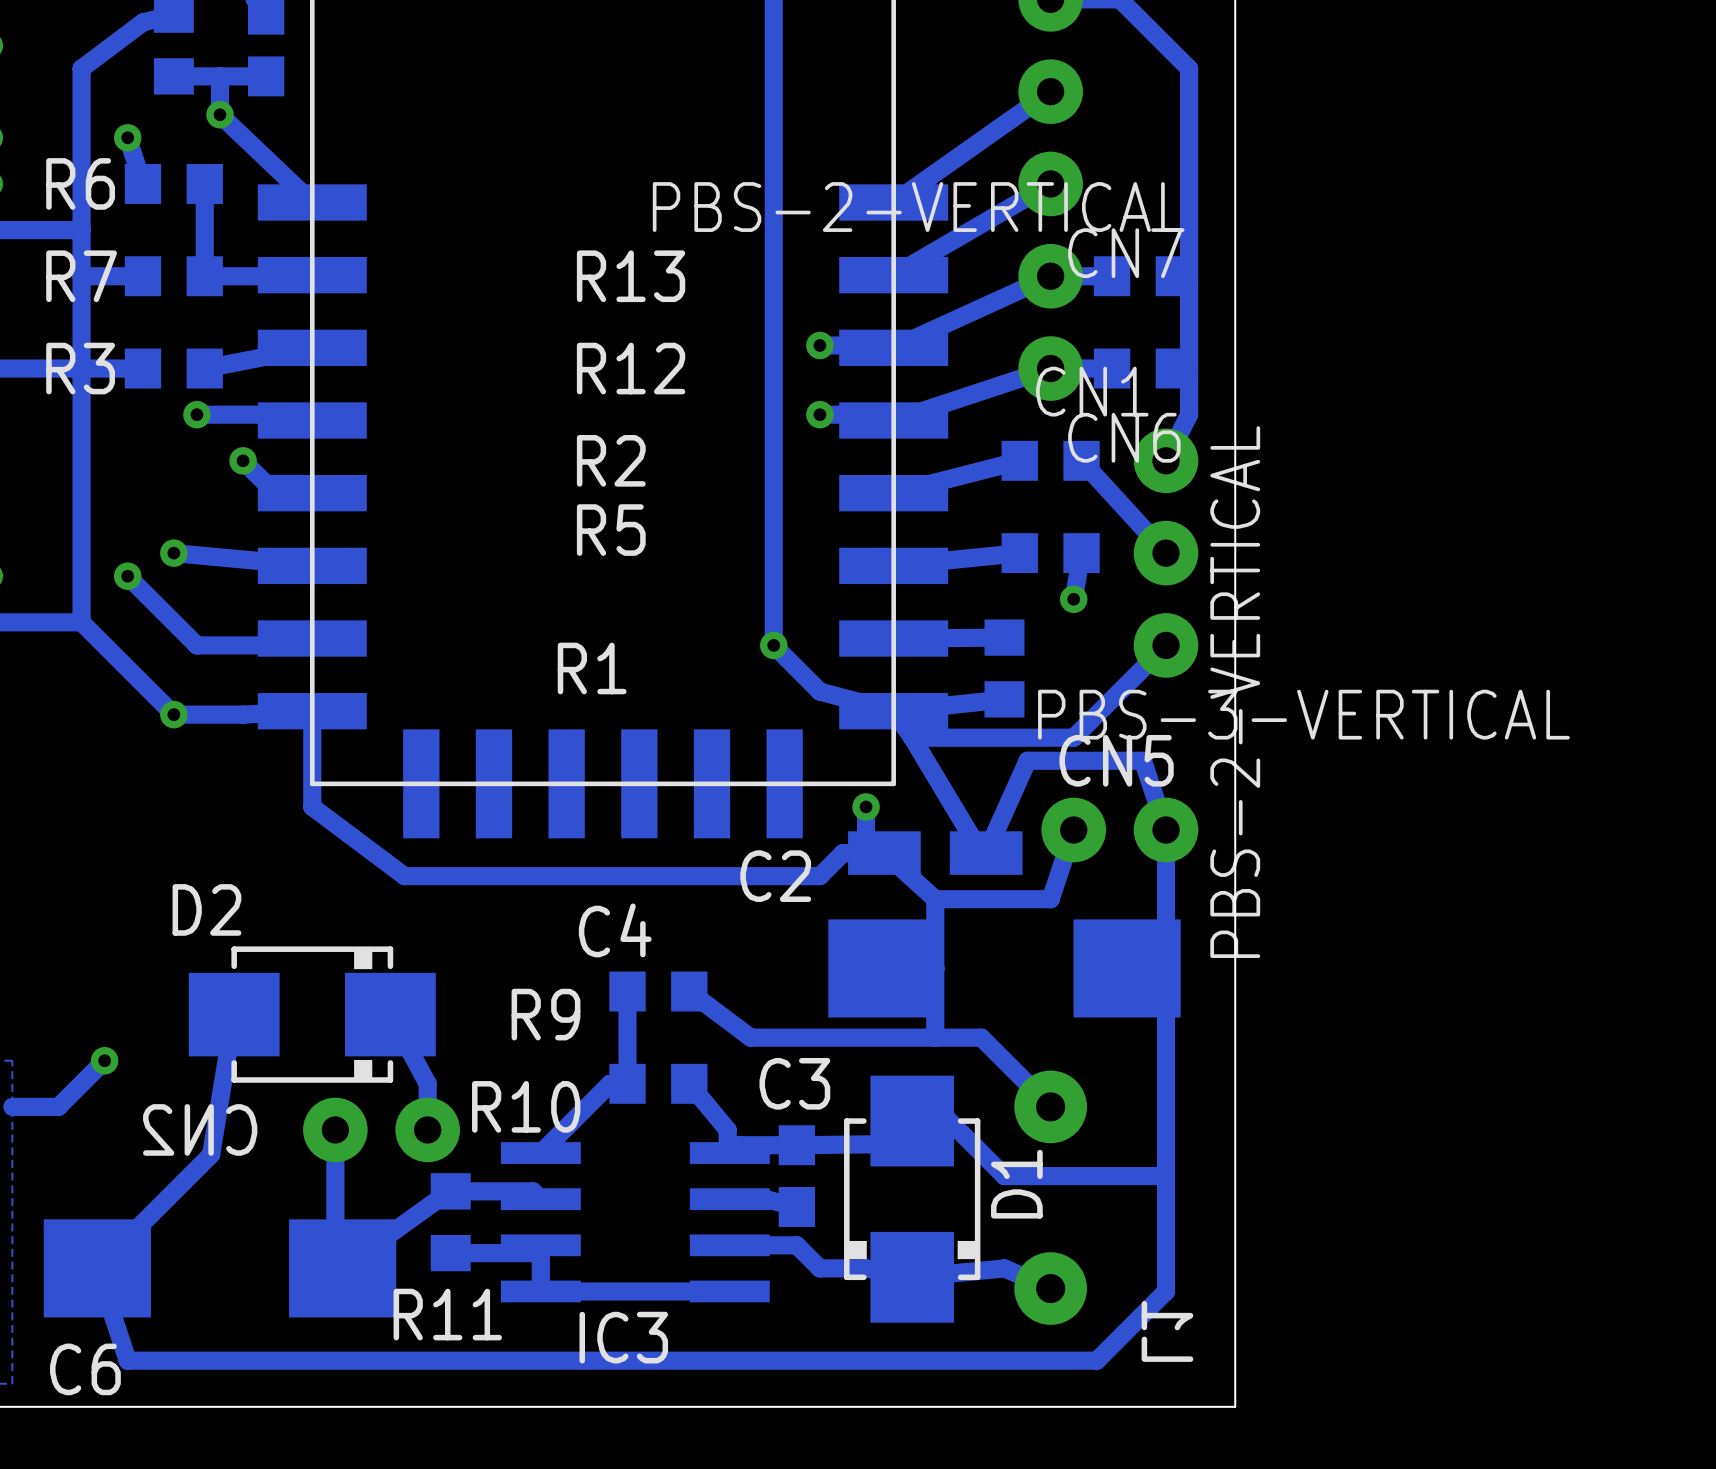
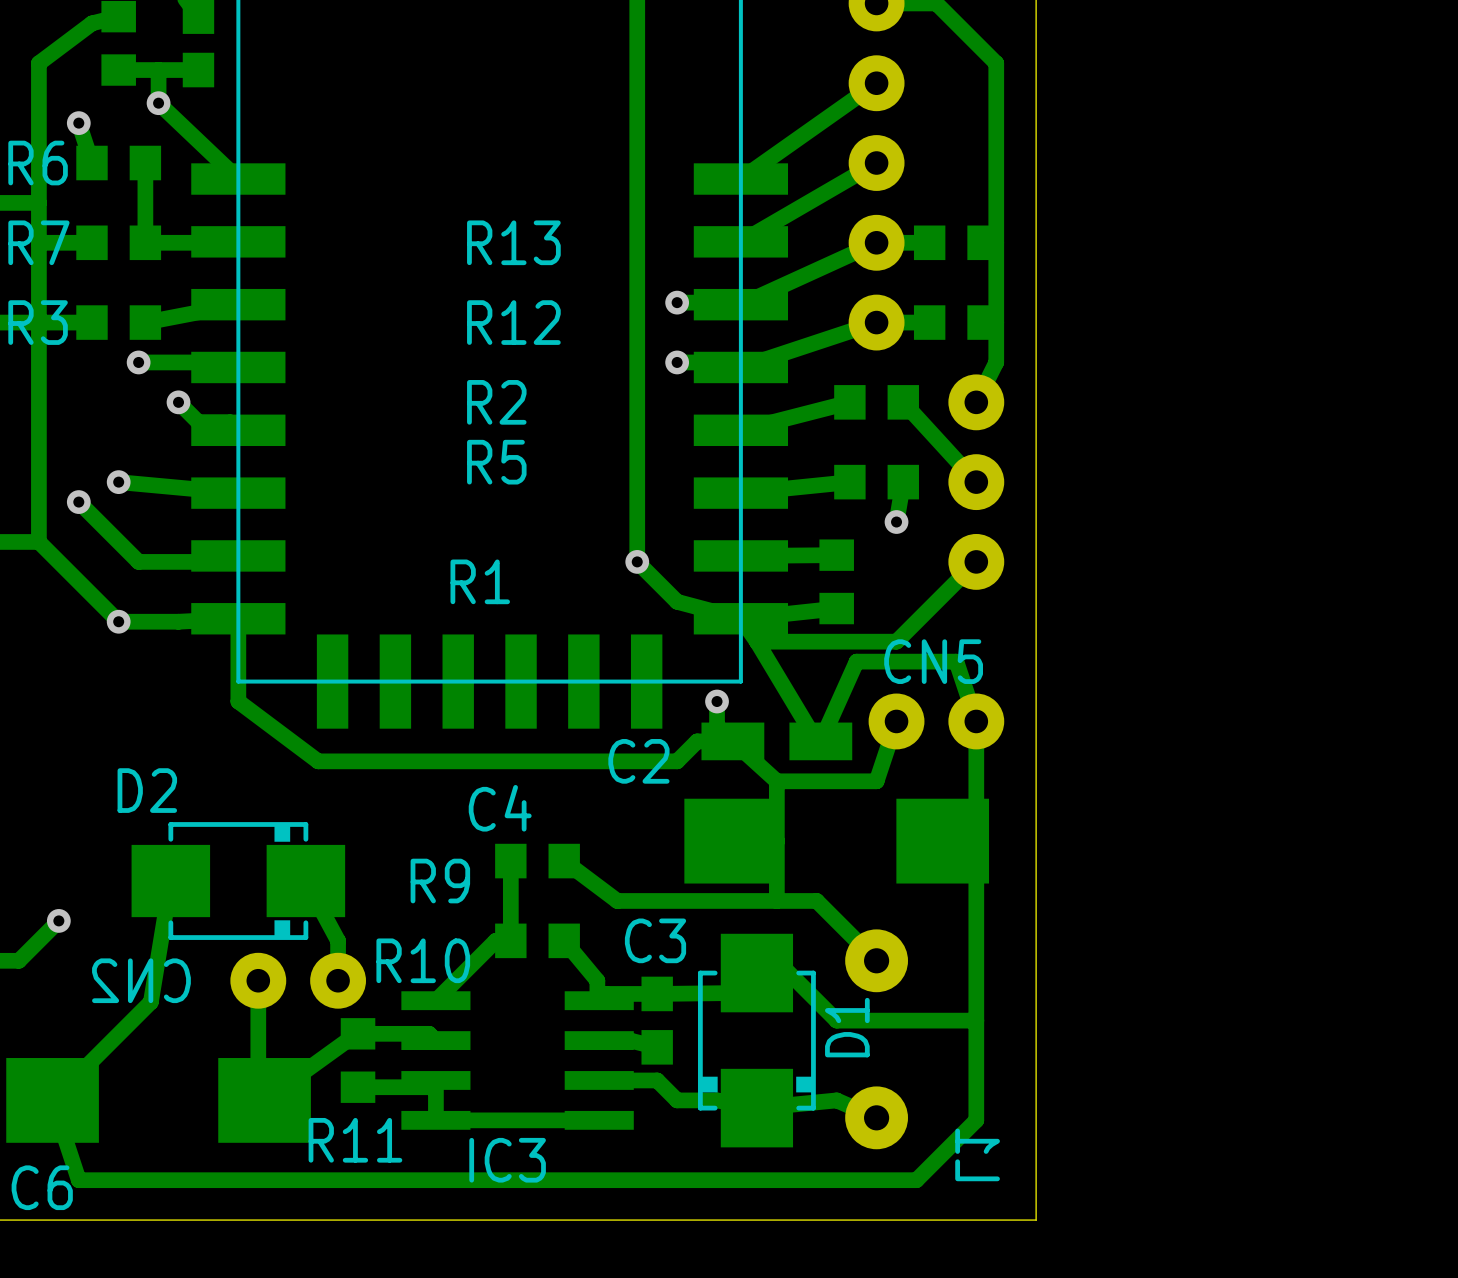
CN6 value: PBS-2-VERTICAL (918, 207) -> none
CN7 name: CN7 (1125, 253) -> none
CN1 name: CN1 (1092, 391) -> none
CN6 name: CN6 (1124, 437) -> none
CN5 value: PBS-2-VERTICAL (1235, 692) -> none
CN1 value: PBS-3-VERTICAL (1303, 714) -> none

